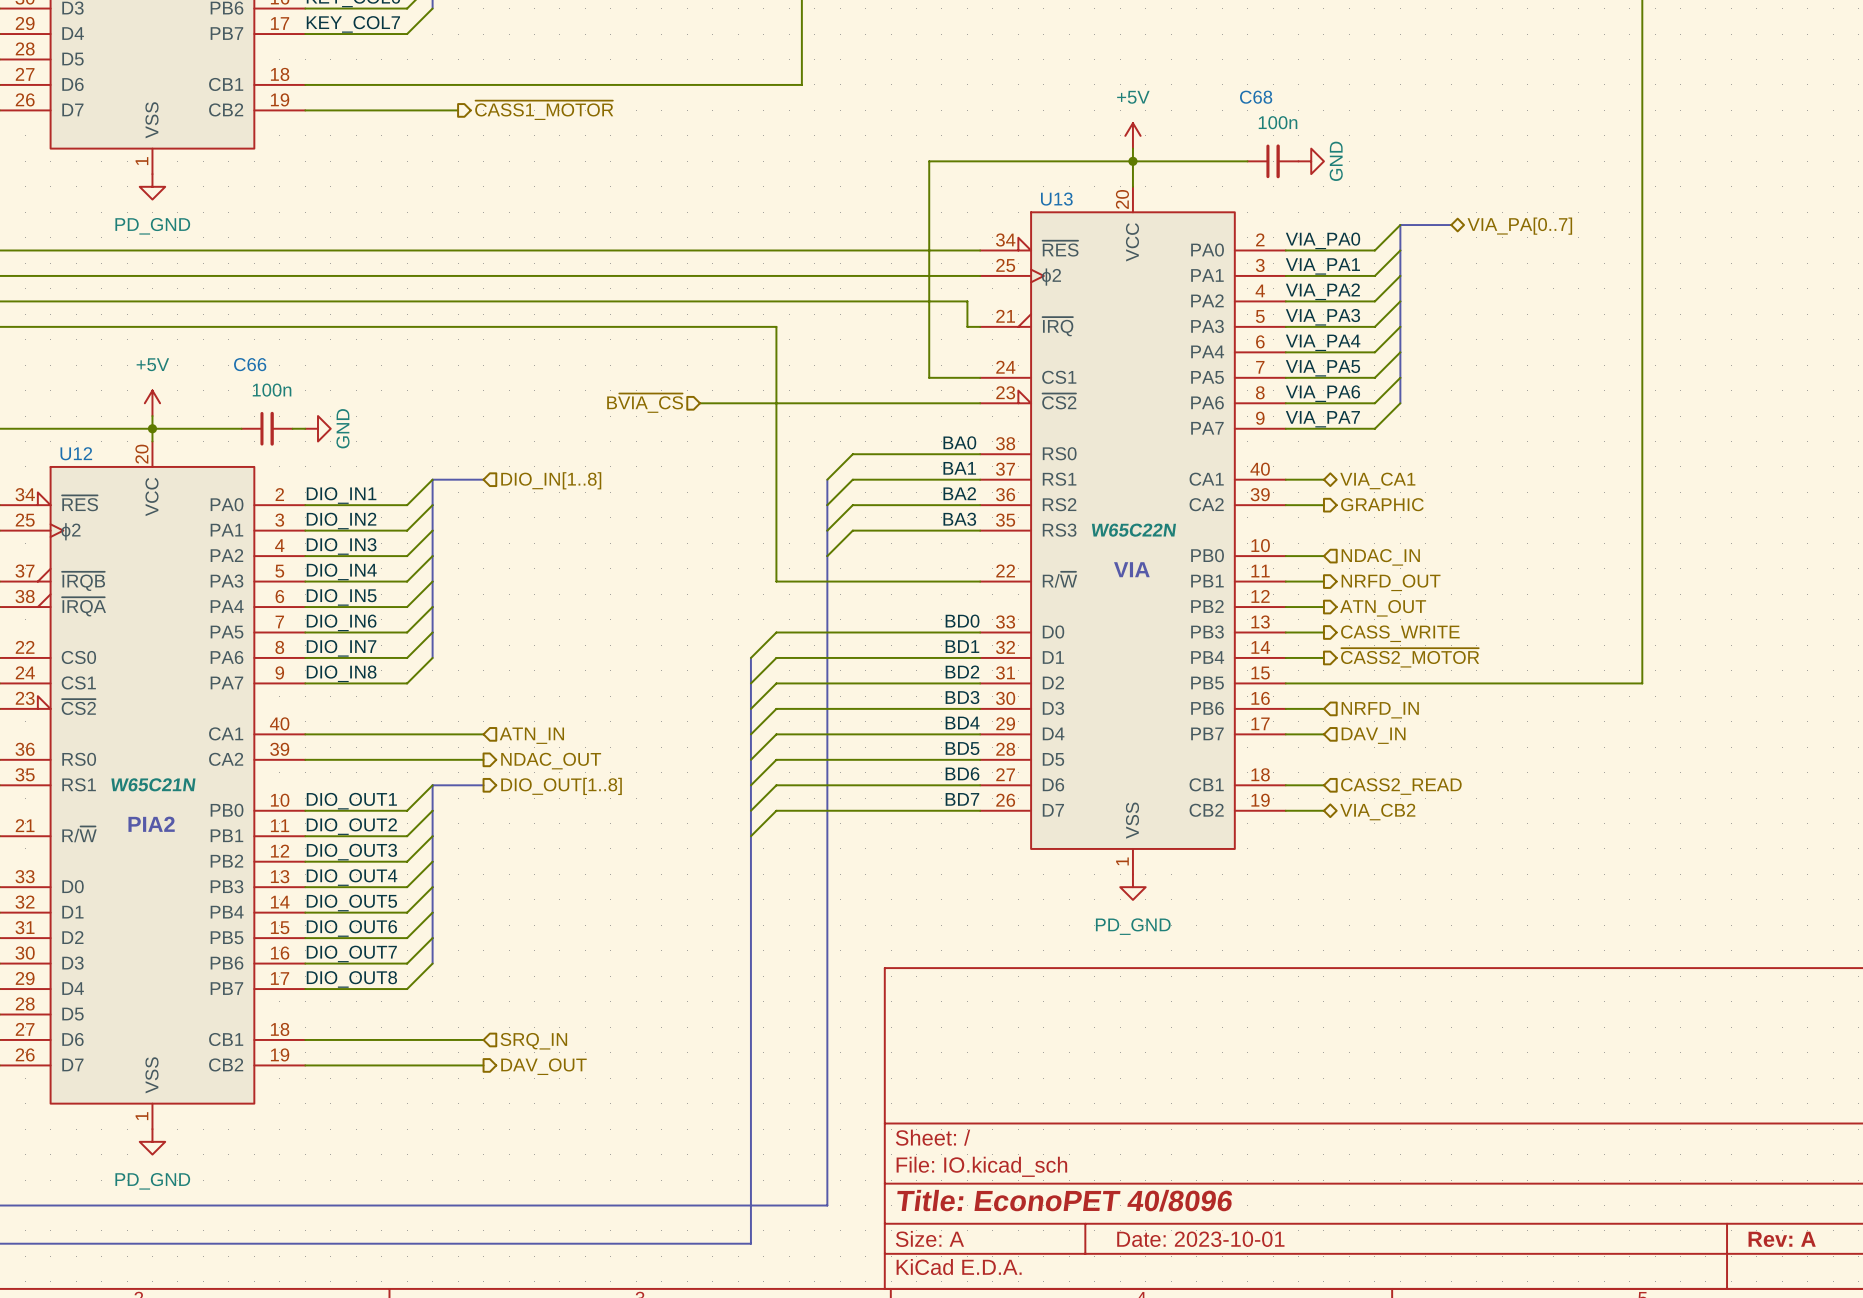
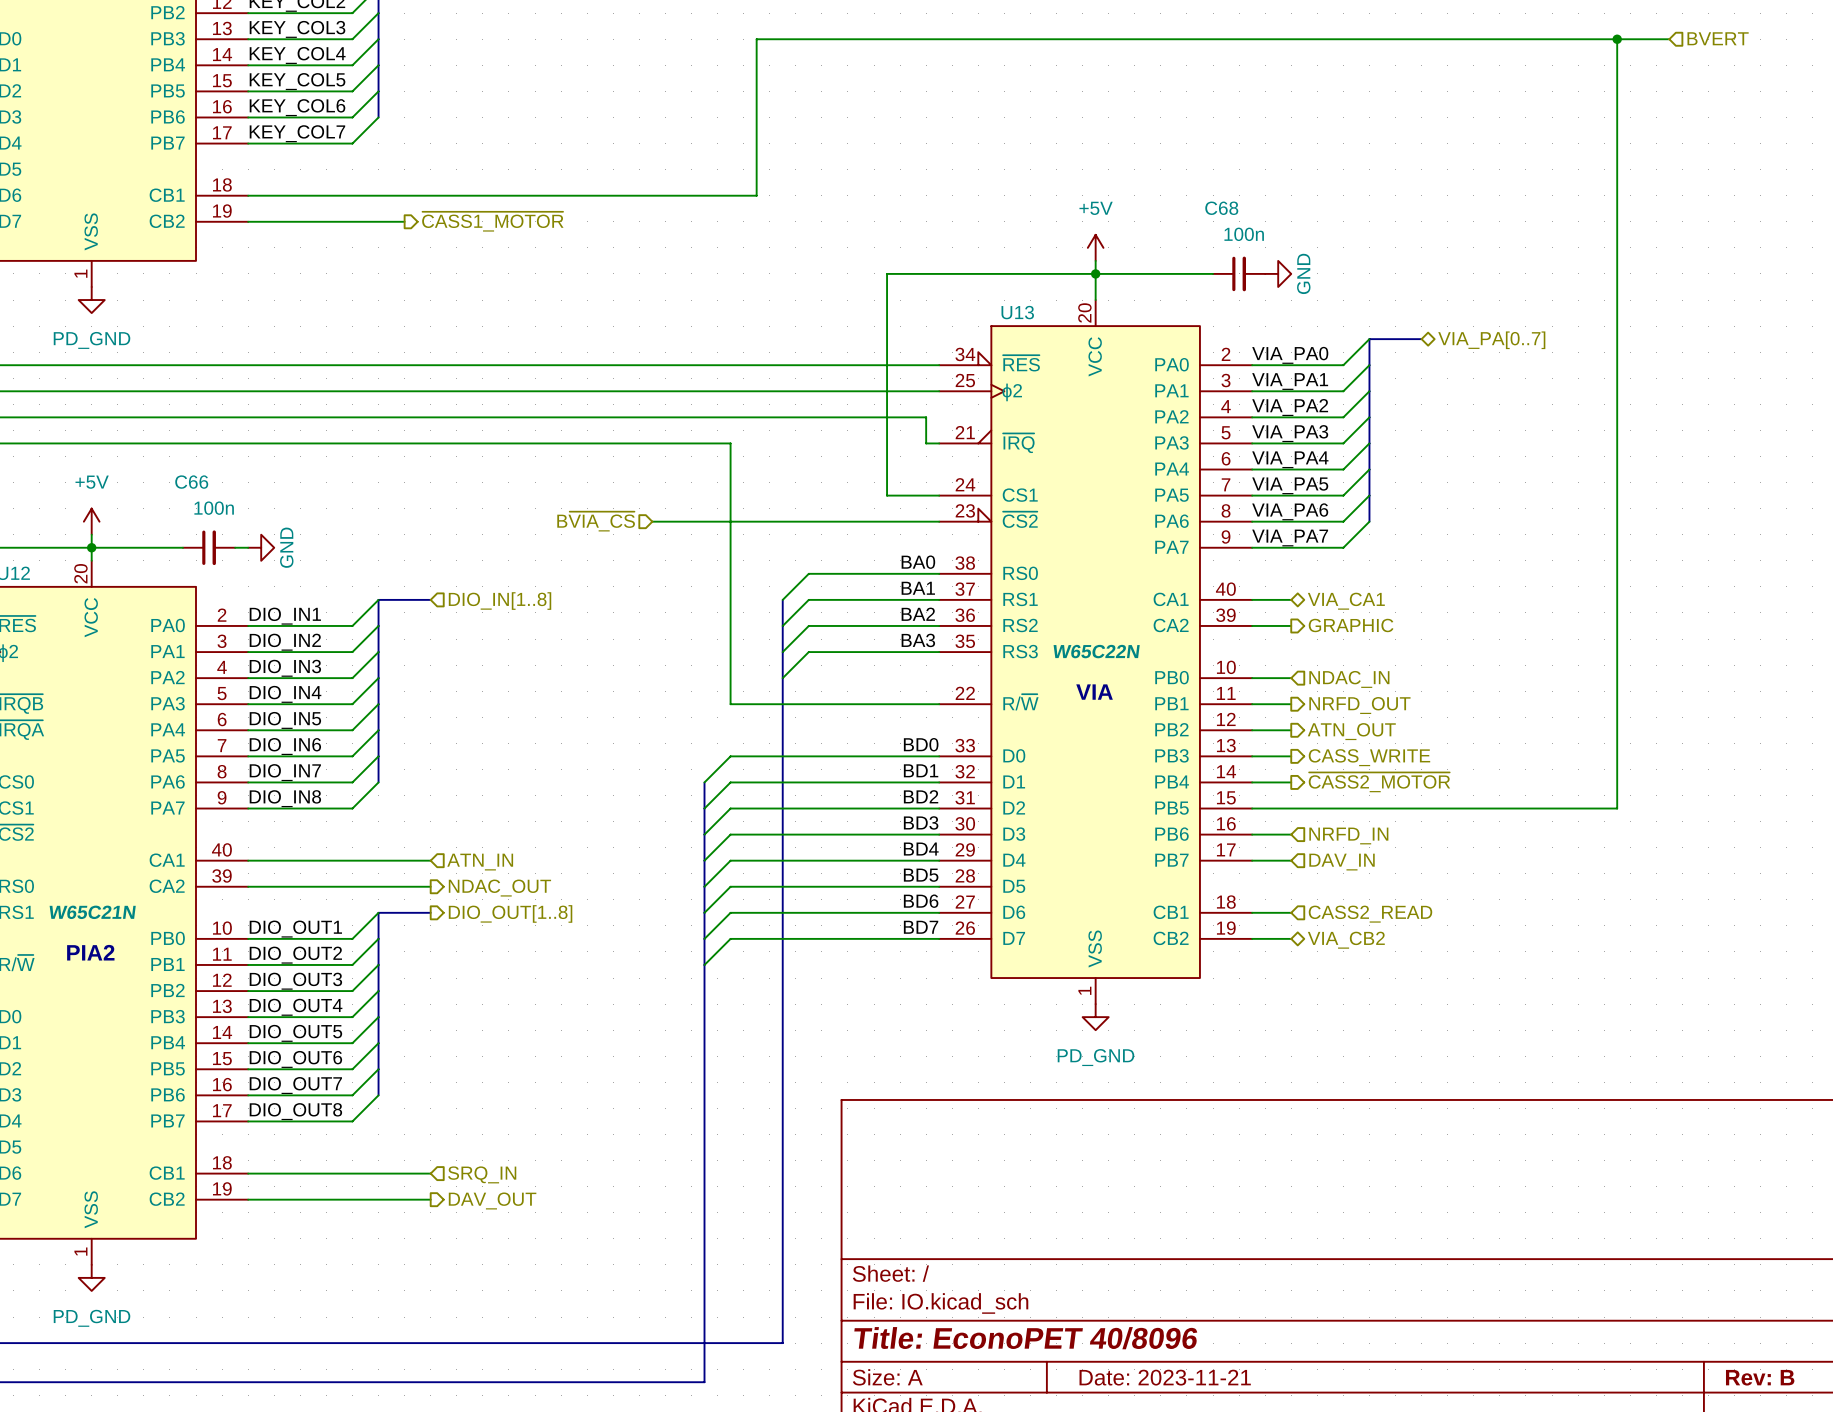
title block: Date: 2023-10-01 (1200, 1239) -> Date: 2023-11-21 (1165, 1377)
title block: Rev: A (1782, 1239) -> Rev: B (1760, 1377)

